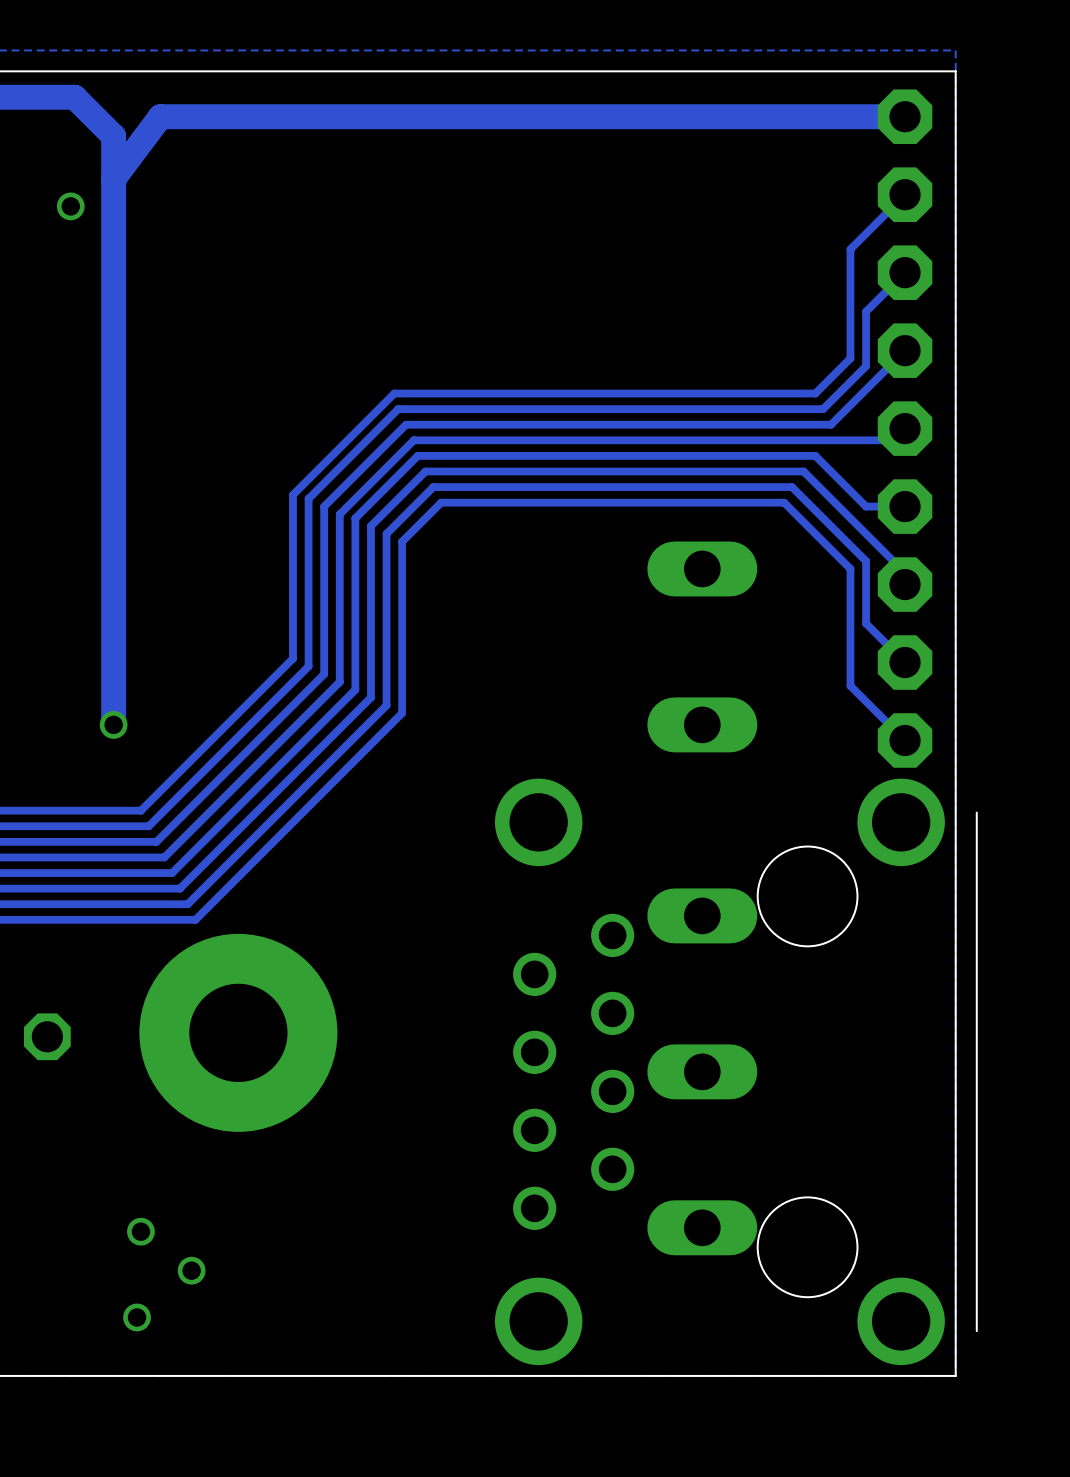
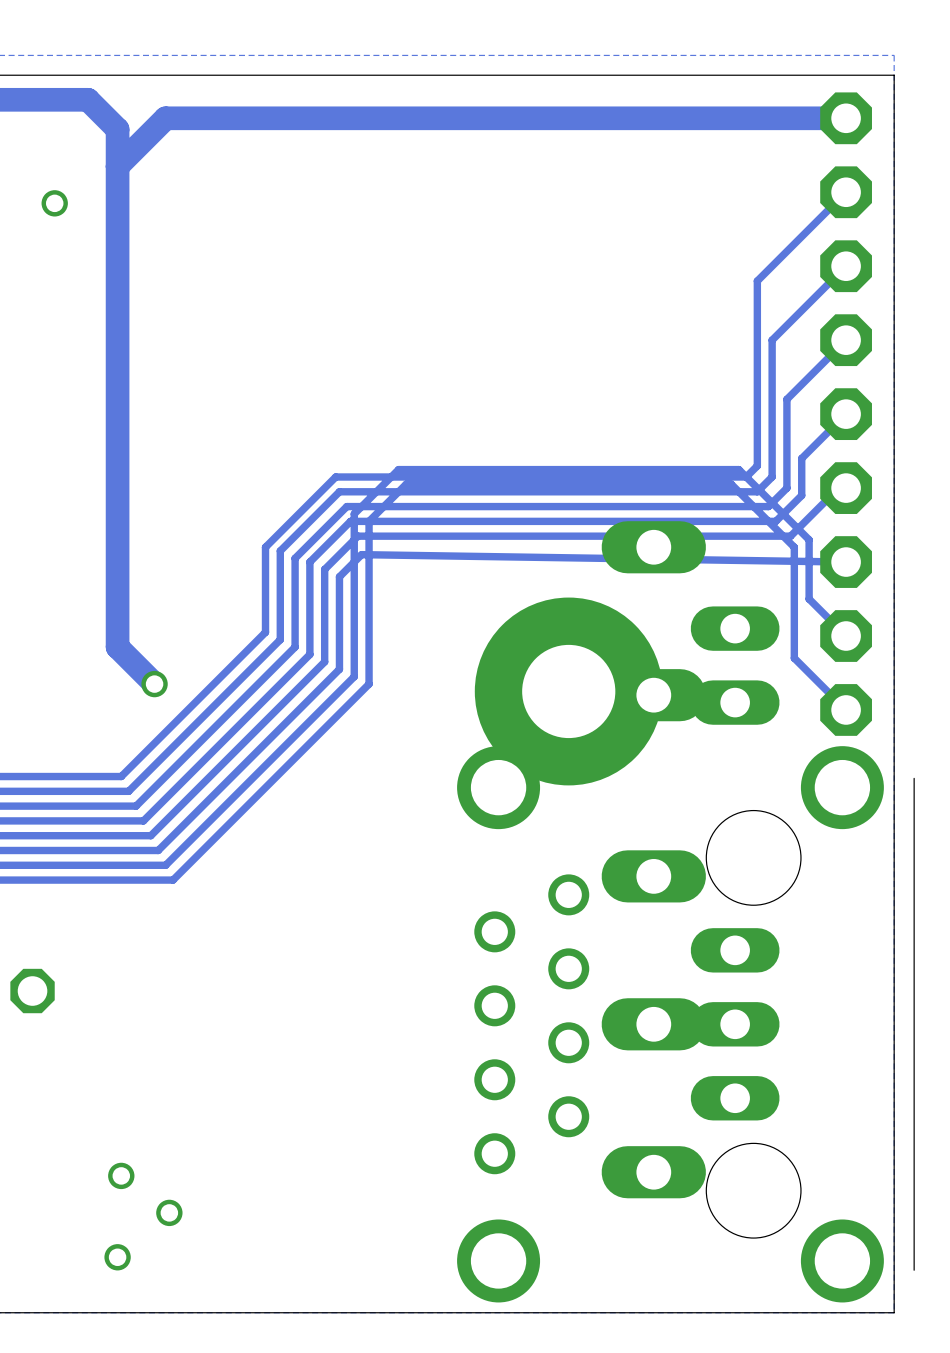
track: (74, 97) (113, 136) (113, 724) -> (58, 99) (88, 99) (117, 129) (117, 647) (154, 684)
track: (187, 116) (160, 116) (113, 179) -> (165, 118) (117, 166)
track: (850, 249) (850, 358) (815, 393) (394, 393) (292, 494) (292, 568) -> (794, 244) (757, 281) (757, 465) (746, 477) (335, 477) (265, 547)
track: (866, 311) (866, 366) (823, 409) (398, 409) (308, 498) (308, 572) -> (809, 303) (772, 340) (772, 477) (757, 491) (339, 491) (280, 550)
track: (842, 413) (830, 424) (406, 424) (324, 506) (324, 580) -> (786, 399) (786, 488) (768, 506) (346, 506) (295, 558)
track: (893, 440) (413, 440) (339, 514) (339, 584) -> (835, 425) (801, 458) (801, 495) (775, 521) (350, 521) (309, 562)
track: (897, 506) (866, 506) (815, 455) (417, 455) (355, 518) (355, 592) -> (838, 488) (790, 536) (357, 536) (324, 569)
track: (905, 584) (901, 580) (901, 568) (803, 471) (425, 471) (370, 526) (370, 600) -> (846, 562) (361, 554) (339, 576)
part: none -> (735, 665)
via: none -> (568, 691)
via position: (113, 724) -> (154, 684)
via: (238, 1032) -> none
part: none -> (735, 1024)

